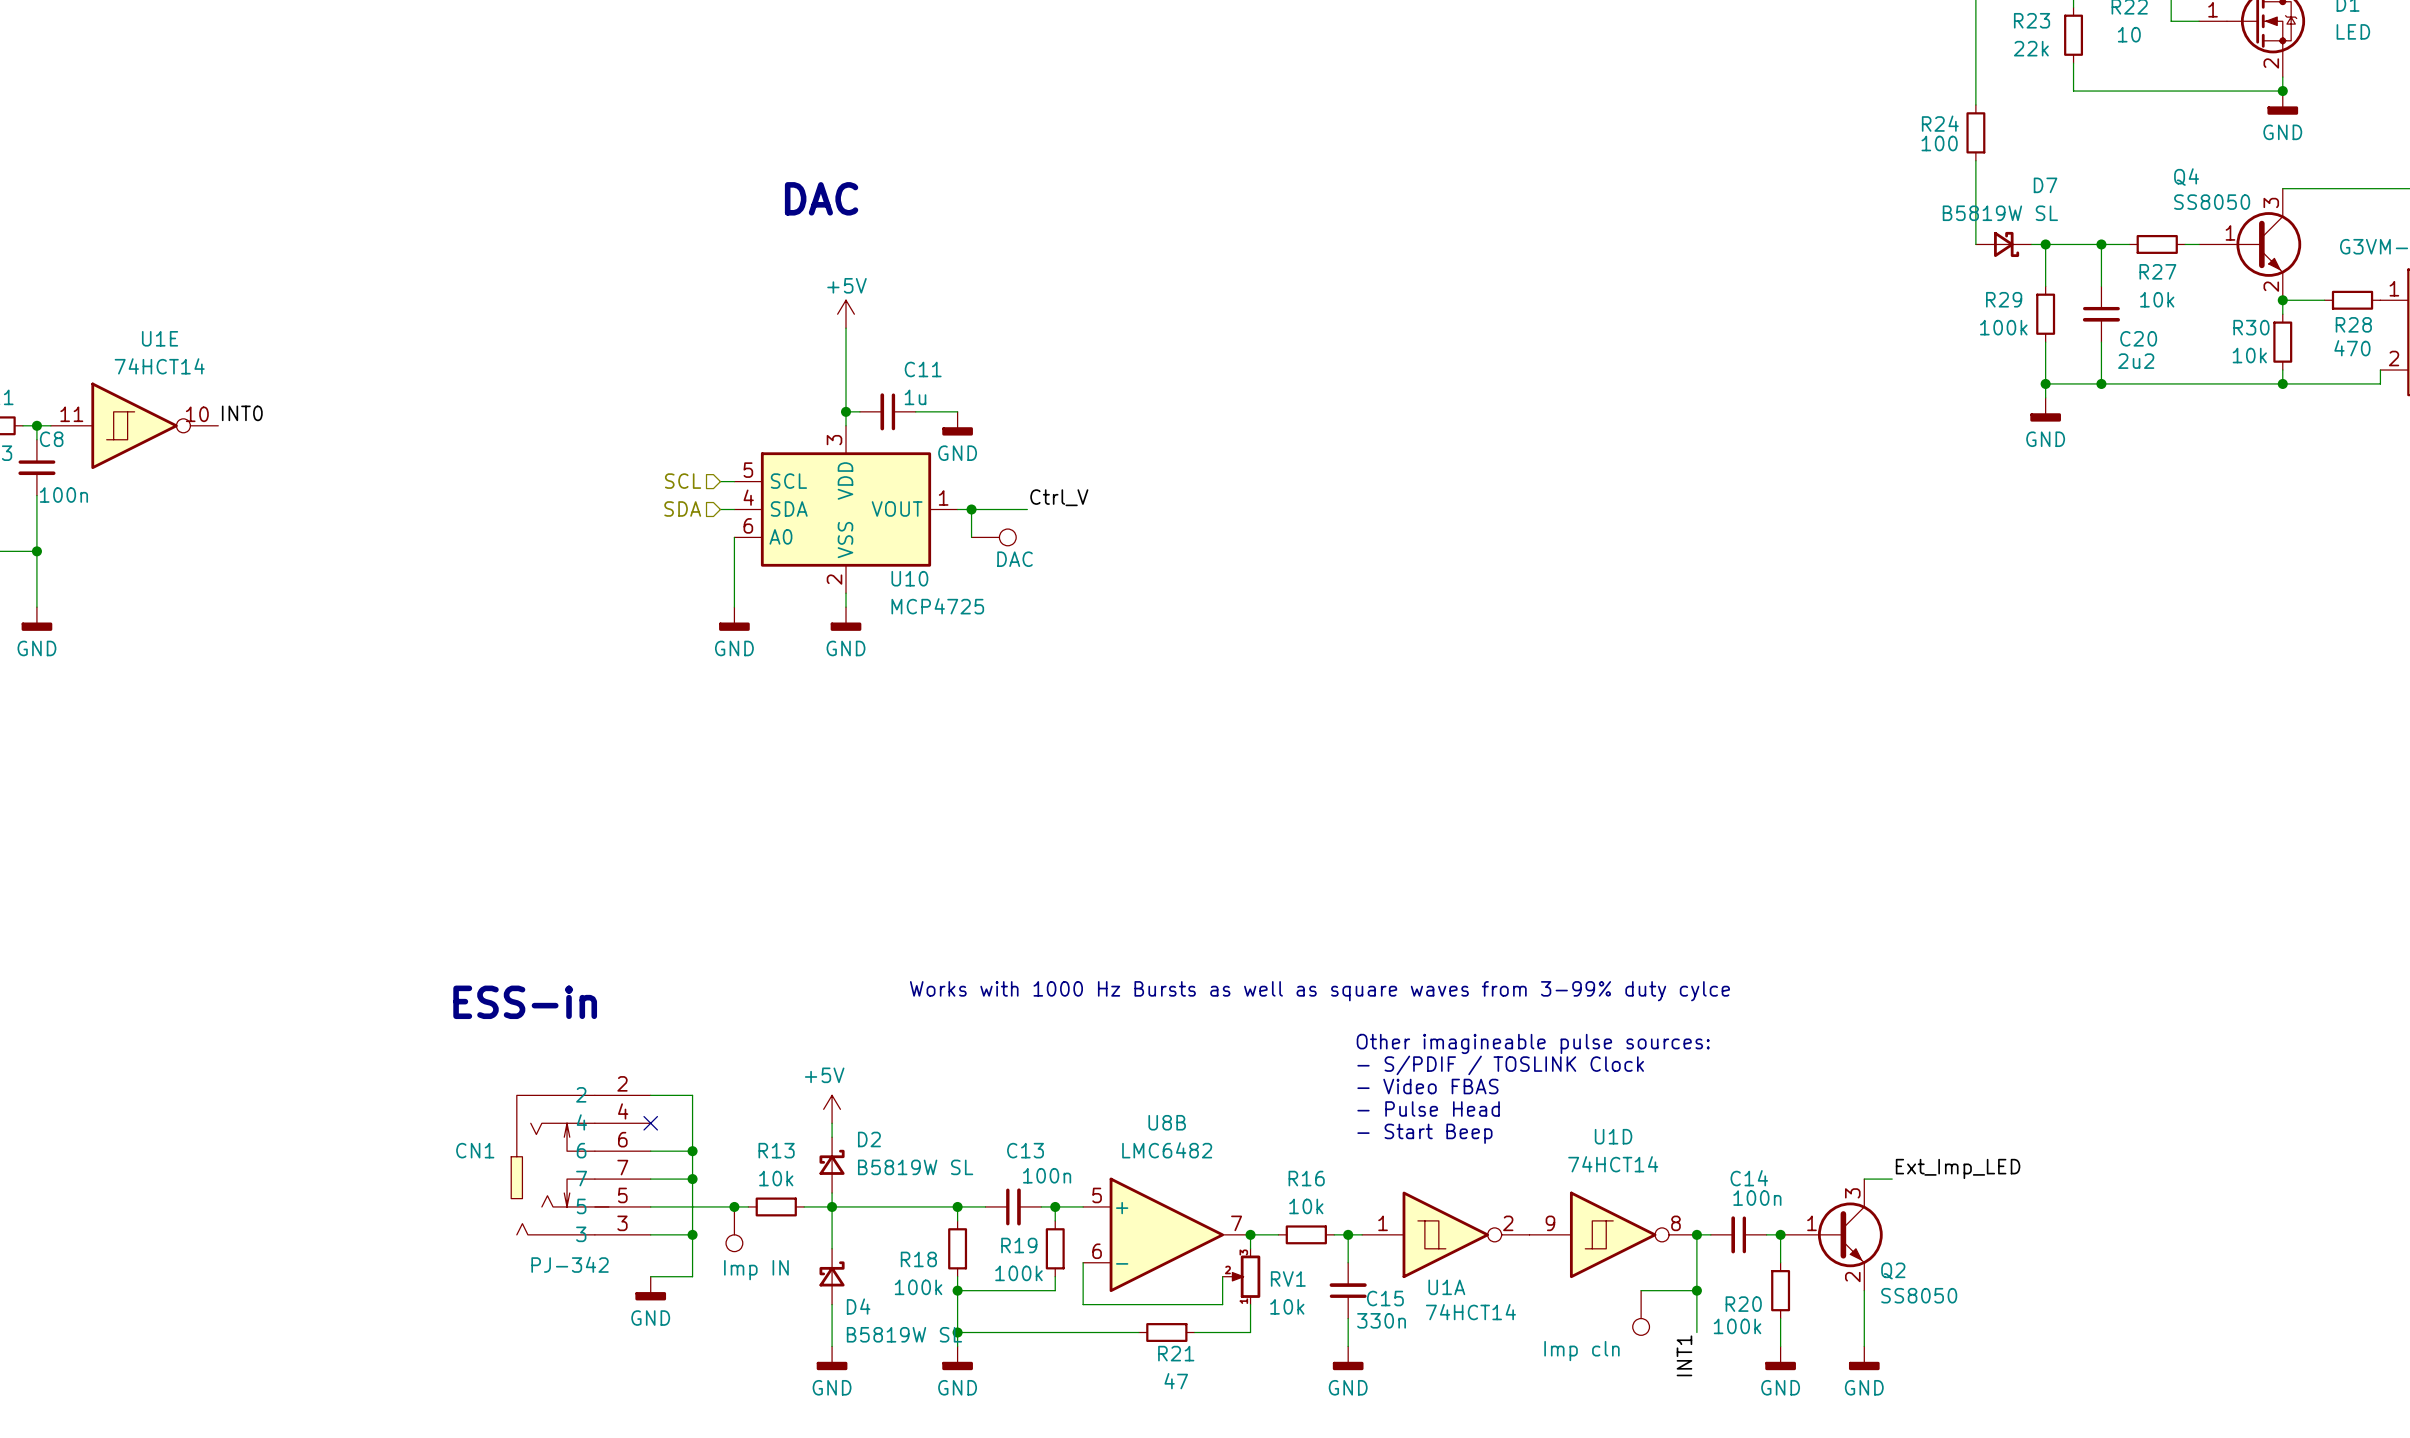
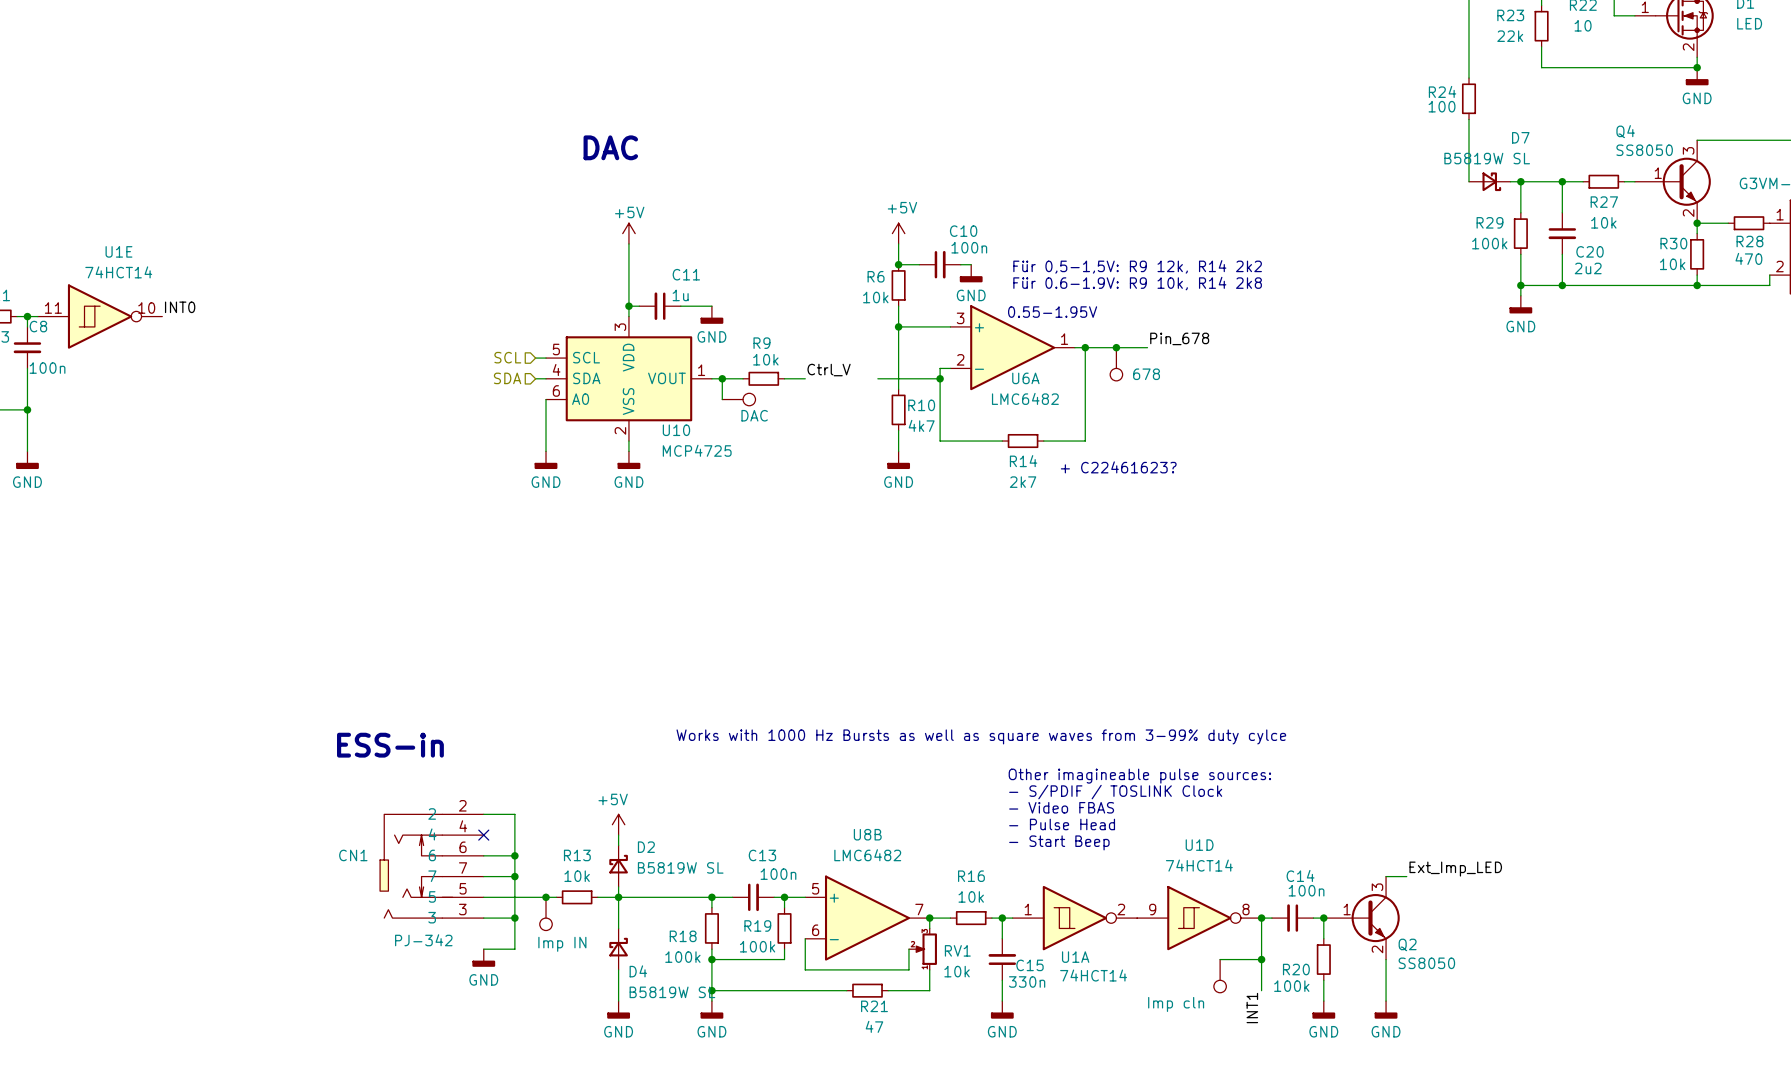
power symbol: none -> +5V (898, 233)
wire: none -> (898, 243) (898, 264) (919, 264)
junction: none -> (898, 264)
C10: none -> 100n (940, 264)
wire: none -> (960, 264) (971, 264)
text: none -> Für 0,5-1,5V: R9 12k, R14 2k2 (1137, 266)
power symbol: none -> GND (971, 273)
text: none -> Für 0.6-1.9V: R9 10k, R14 2k8 (1137, 283)
R6: none -> 10k (898, 285)
wire: none -> (898, 306) (898, 389)
text: none -> 0.55-1.95V (1052, 312)
wire: none -> (898, 326) (950, 326)
junction: none -> (898, 326)
label: none -> Pin_678 (1179, 338)
U6A: none -> LMC6482 (1012, 347)
wire: none -> (1074, 347) (1147, 347)
wire: none -> (1085, 347) (1085, 441) (1043, 441)
junction: none -> (1085, 347)
junction: none -> (1116, 347)
part: none -> 678 (1116, 364)
wire: none -> (950, 368) (940, 368) (940, 441) (1002, 441)
label position: Ctrl_V (1059, 497) -> Ctrl_V (829, 370)
wire: (999, 509) (1027, 509) -> (784, 378) (805, 378)
R9: none -> 10k (763, 378)
wire: none -> (877, 378) (940, 378)
junction: none -> (940, 378)
R10: none -> 4k7 (898, 409)
wire: none -> (898, 430) (898, 451)
R14: none -> 2k7 (1023, 441)
power symbol: none -> GND (898, 460)
text: none -> + C22461623? (1118, 467)

